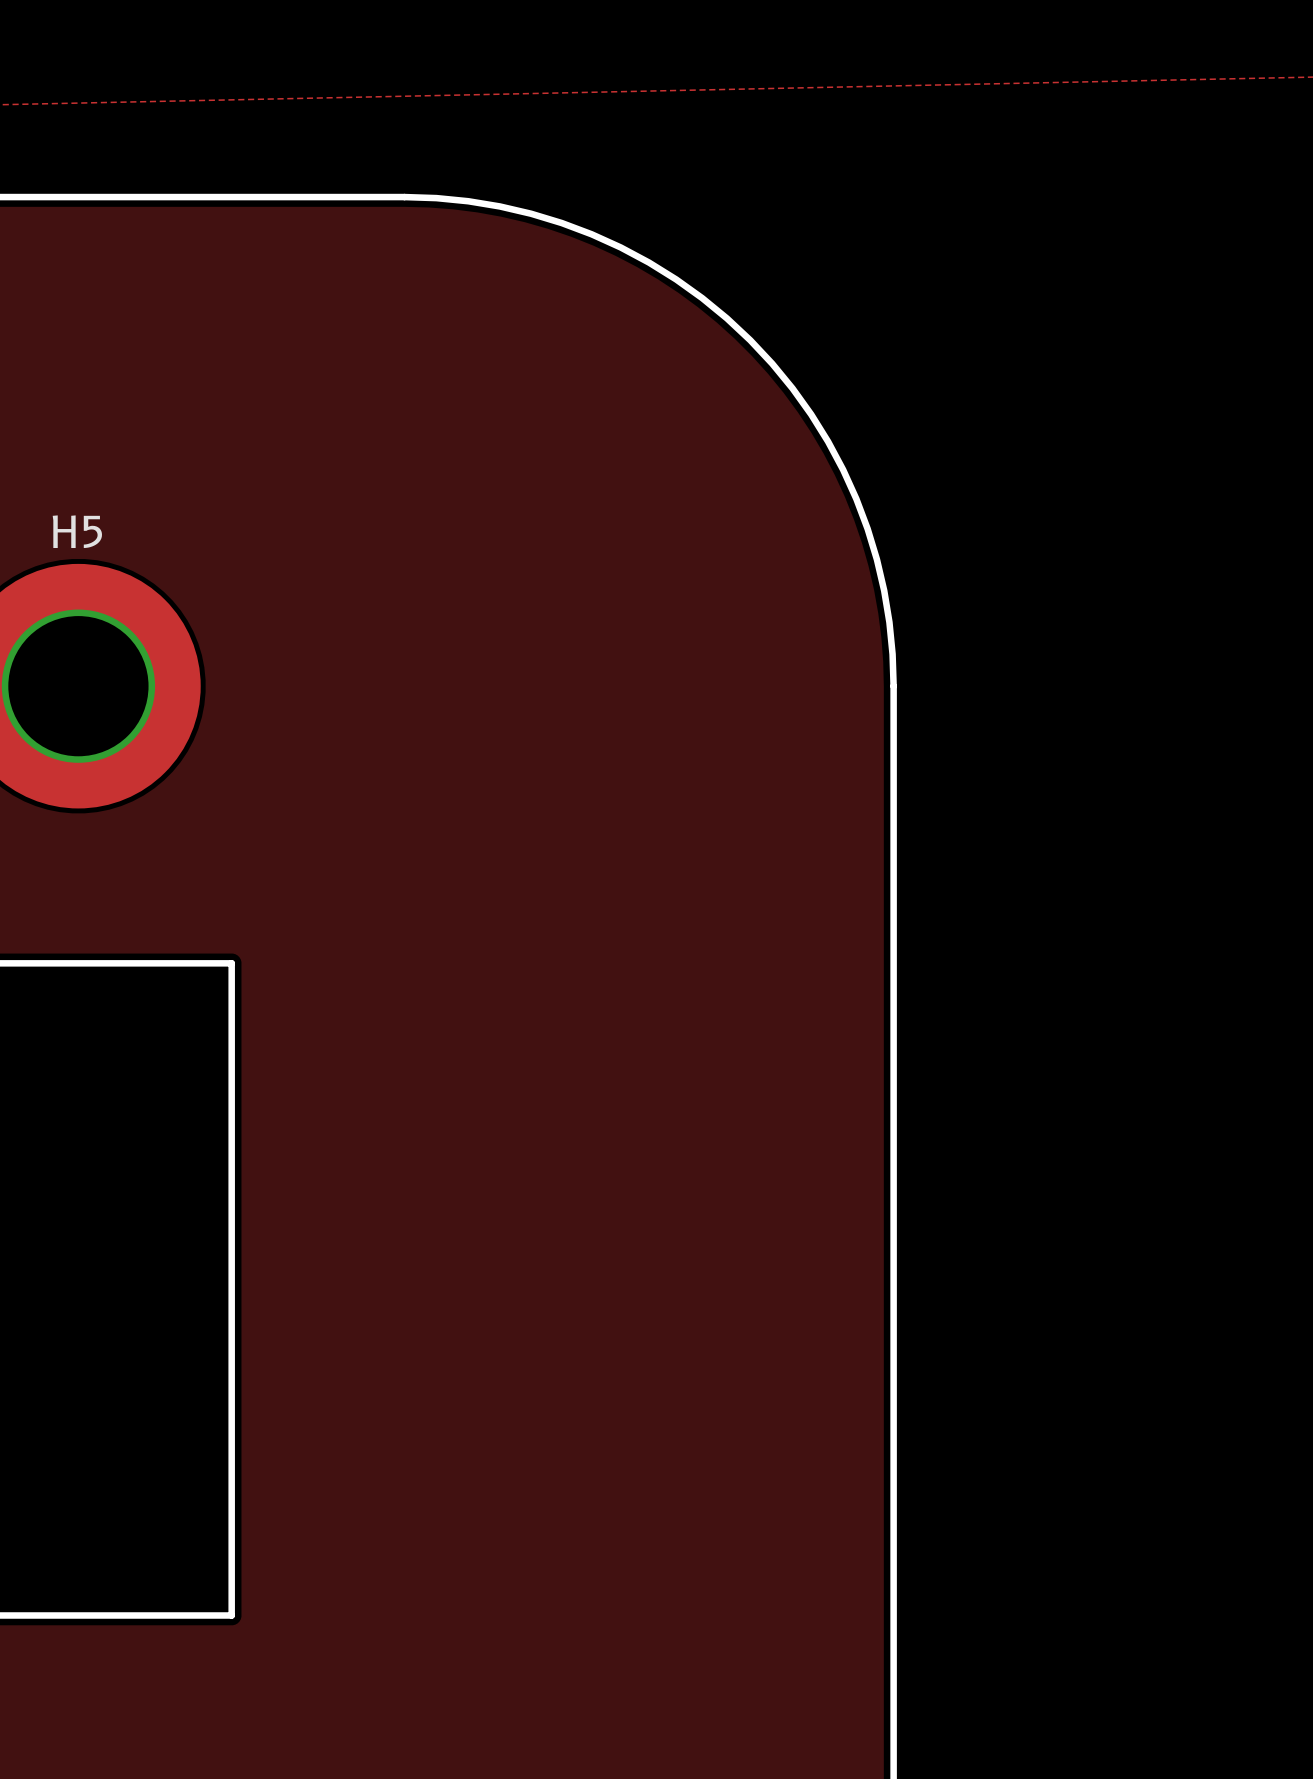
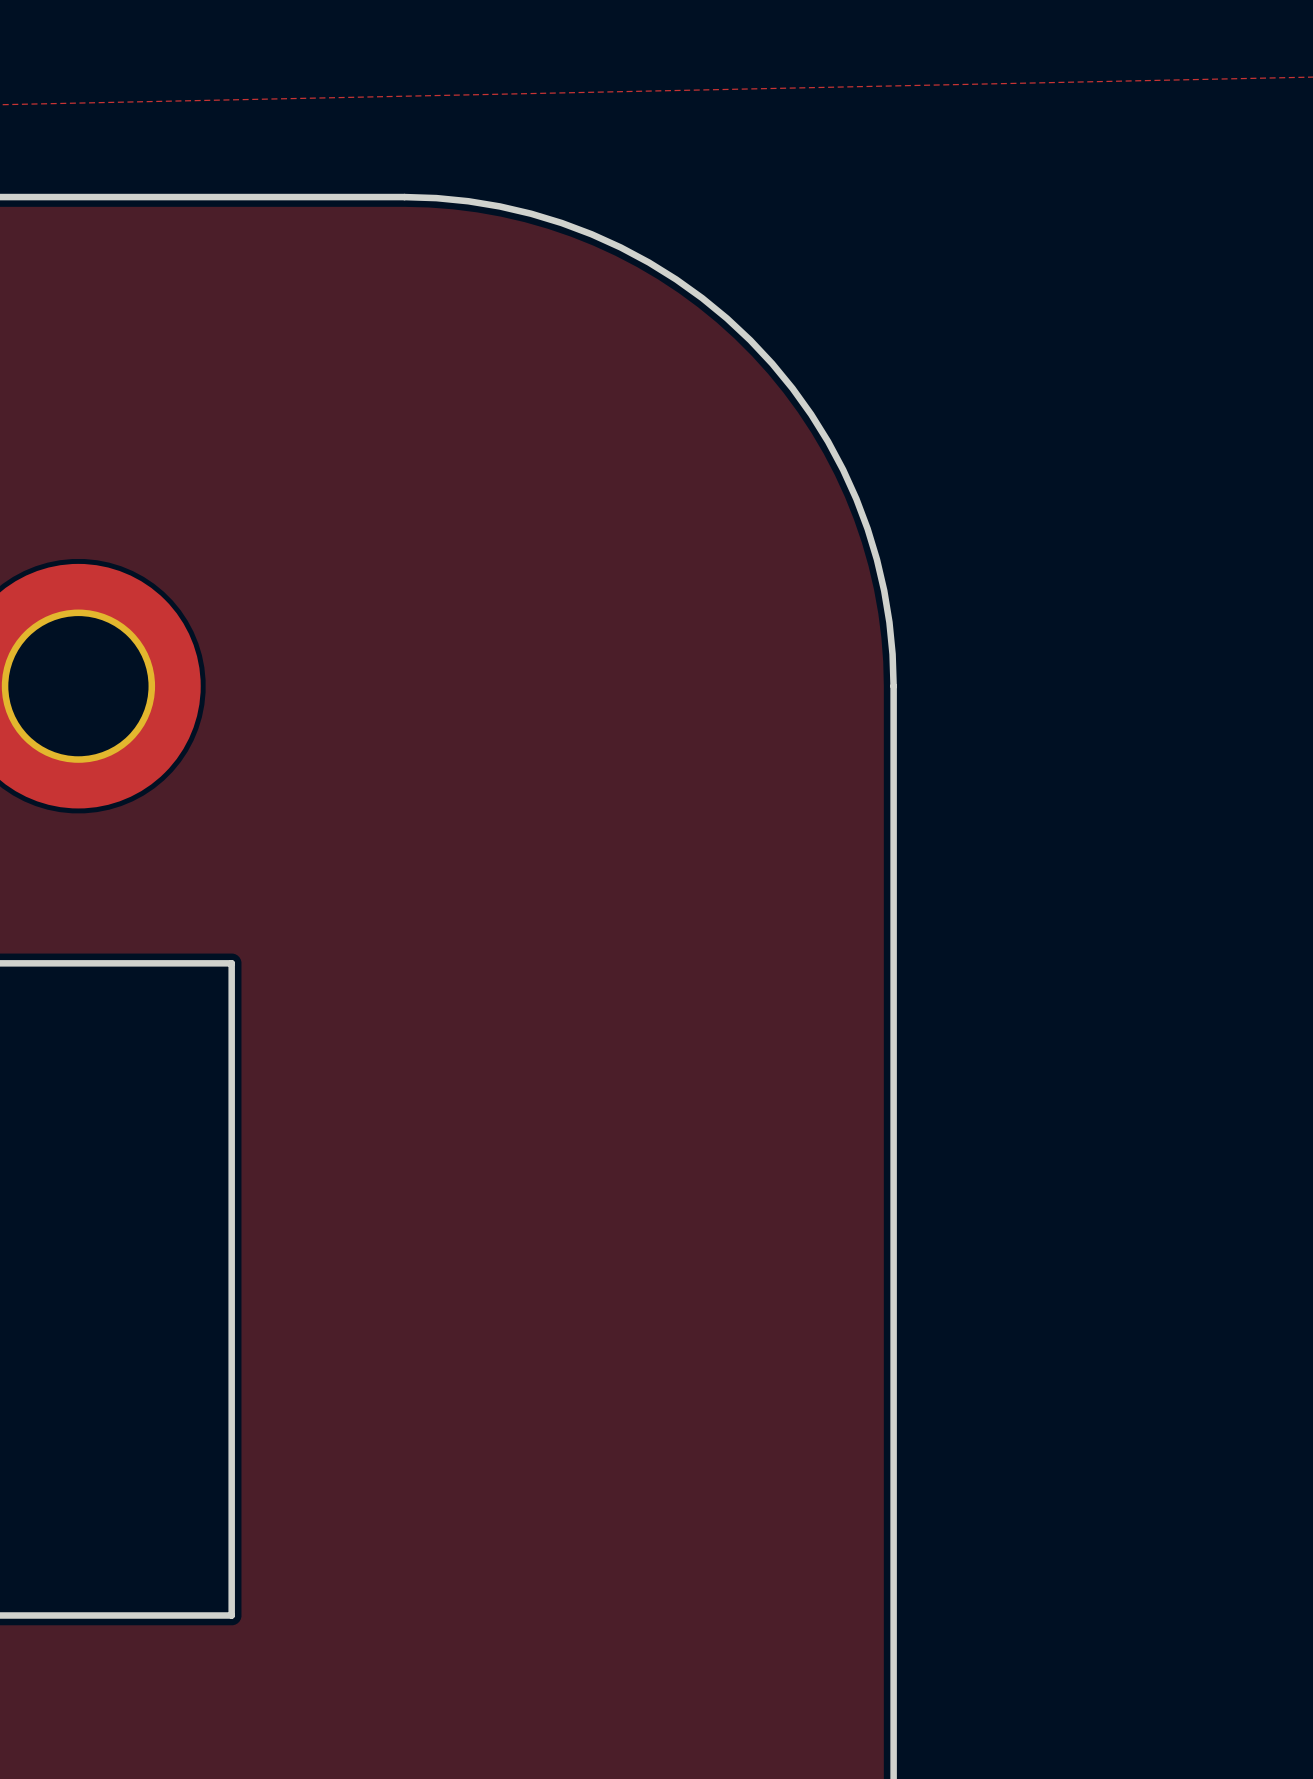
H5 name: H5 (77, 531) -> none

